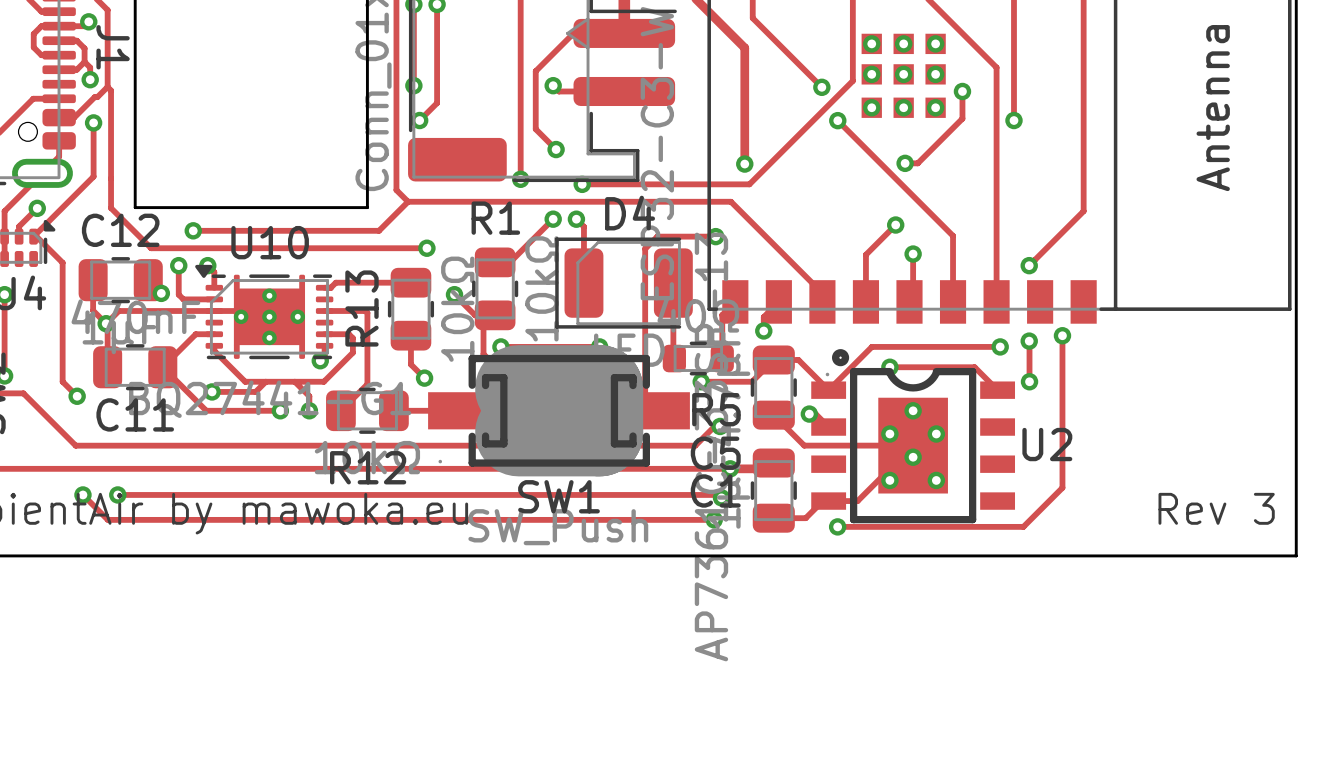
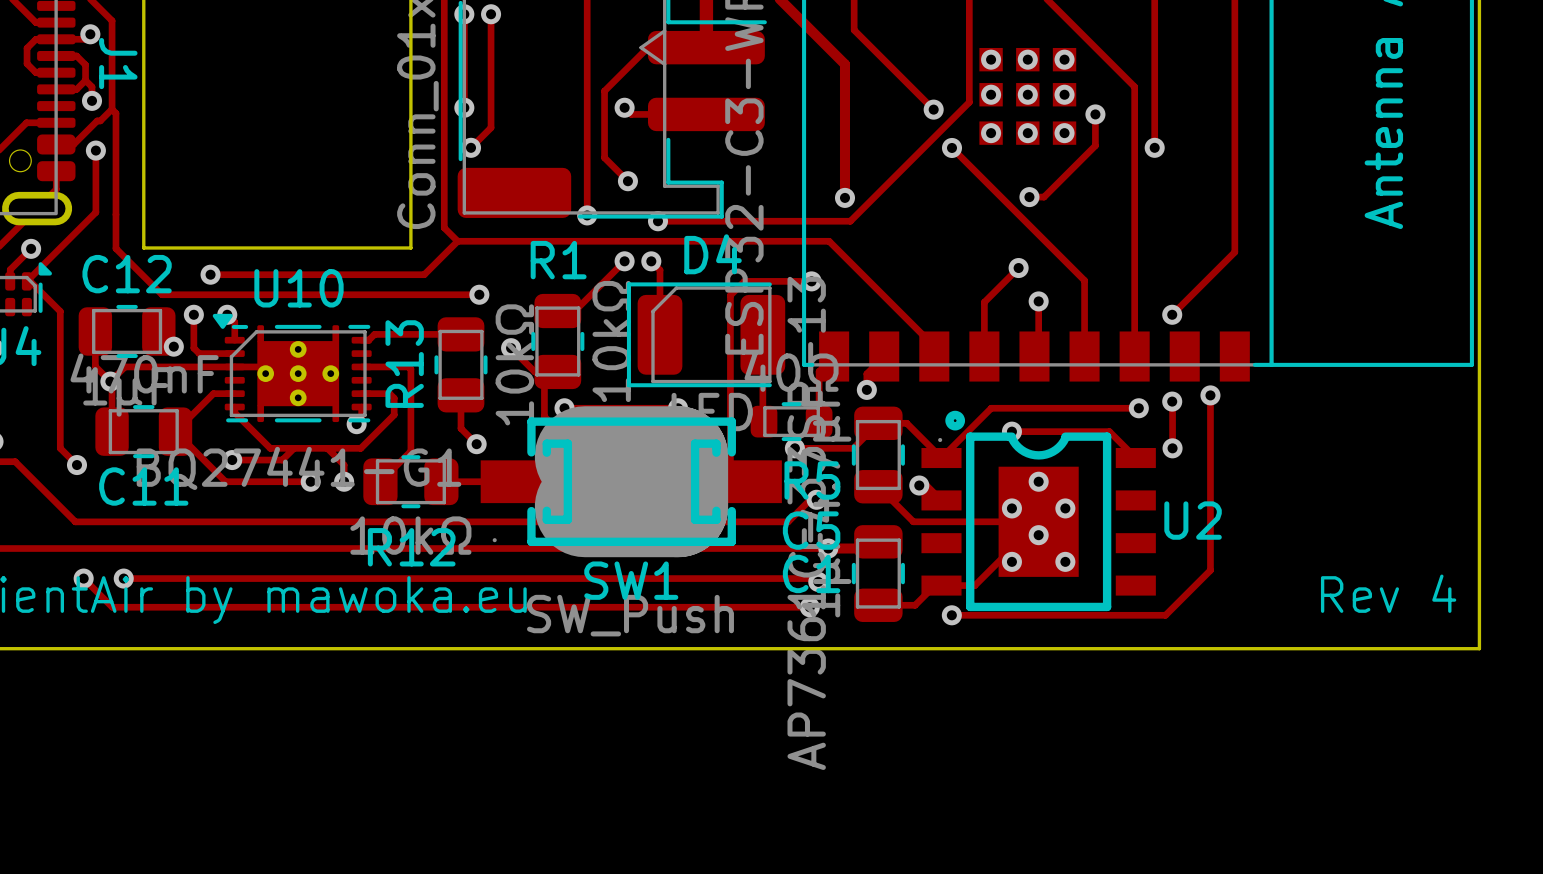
text: Rev 3 (1216, 508) -> Rev 4 (1388, 593)

